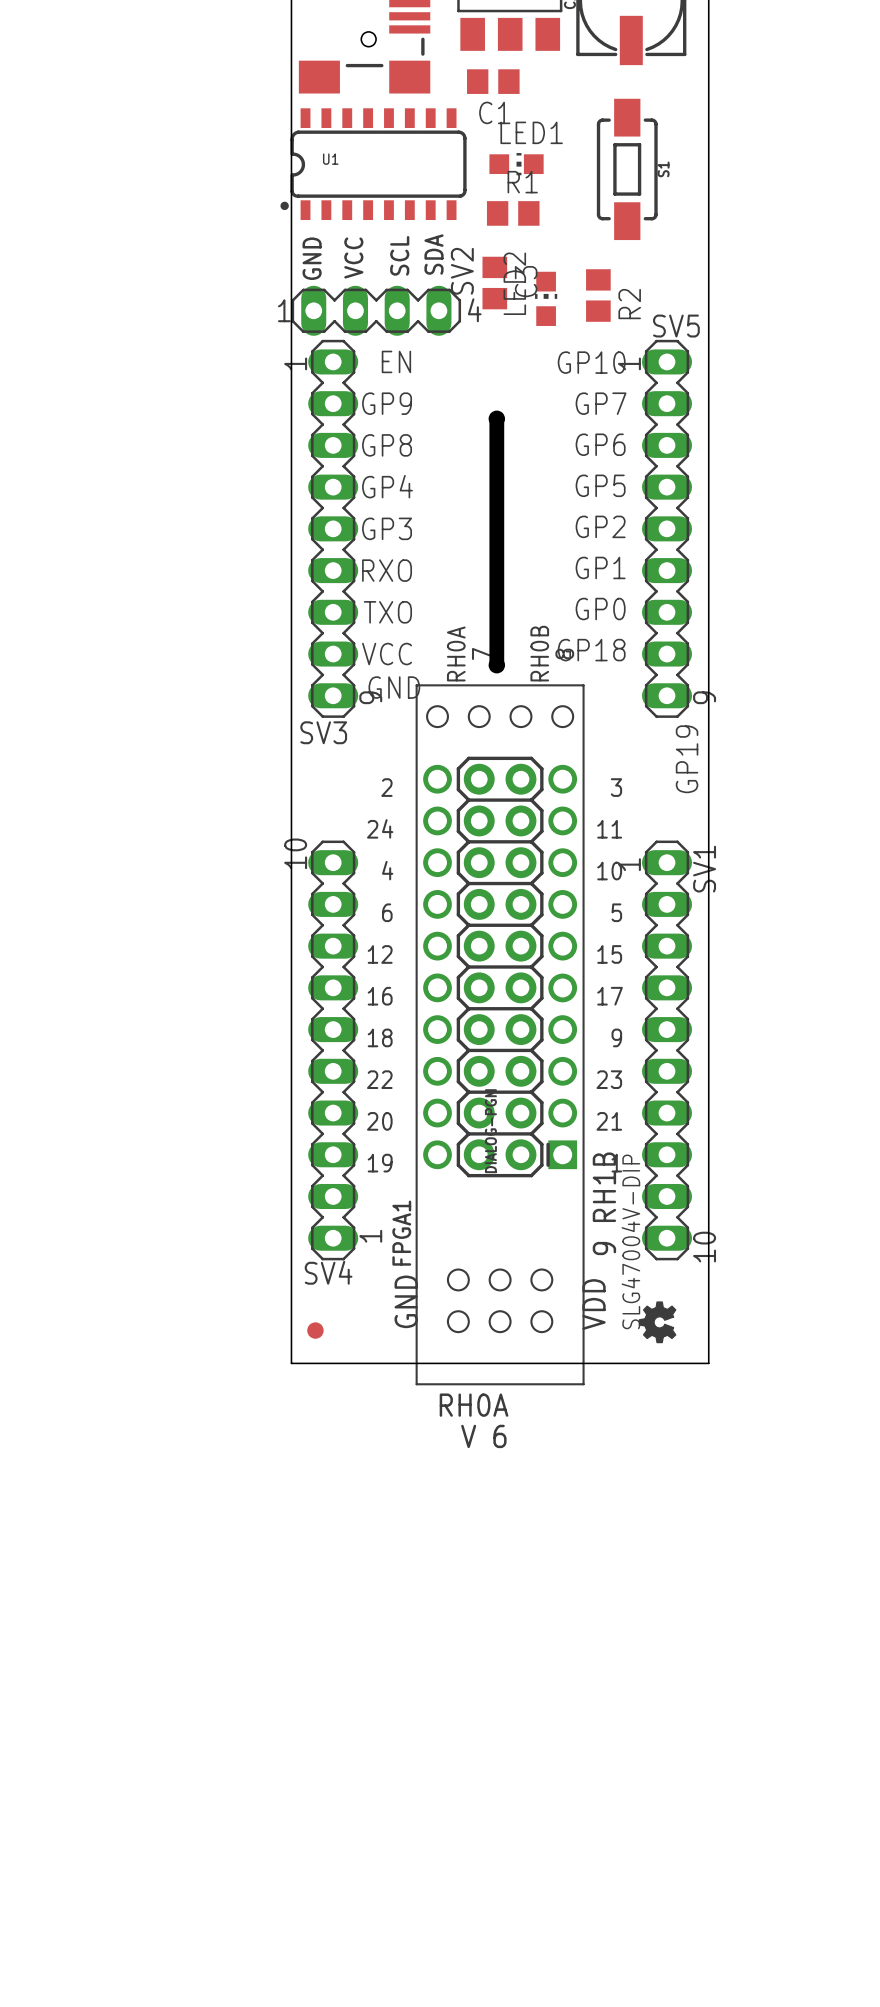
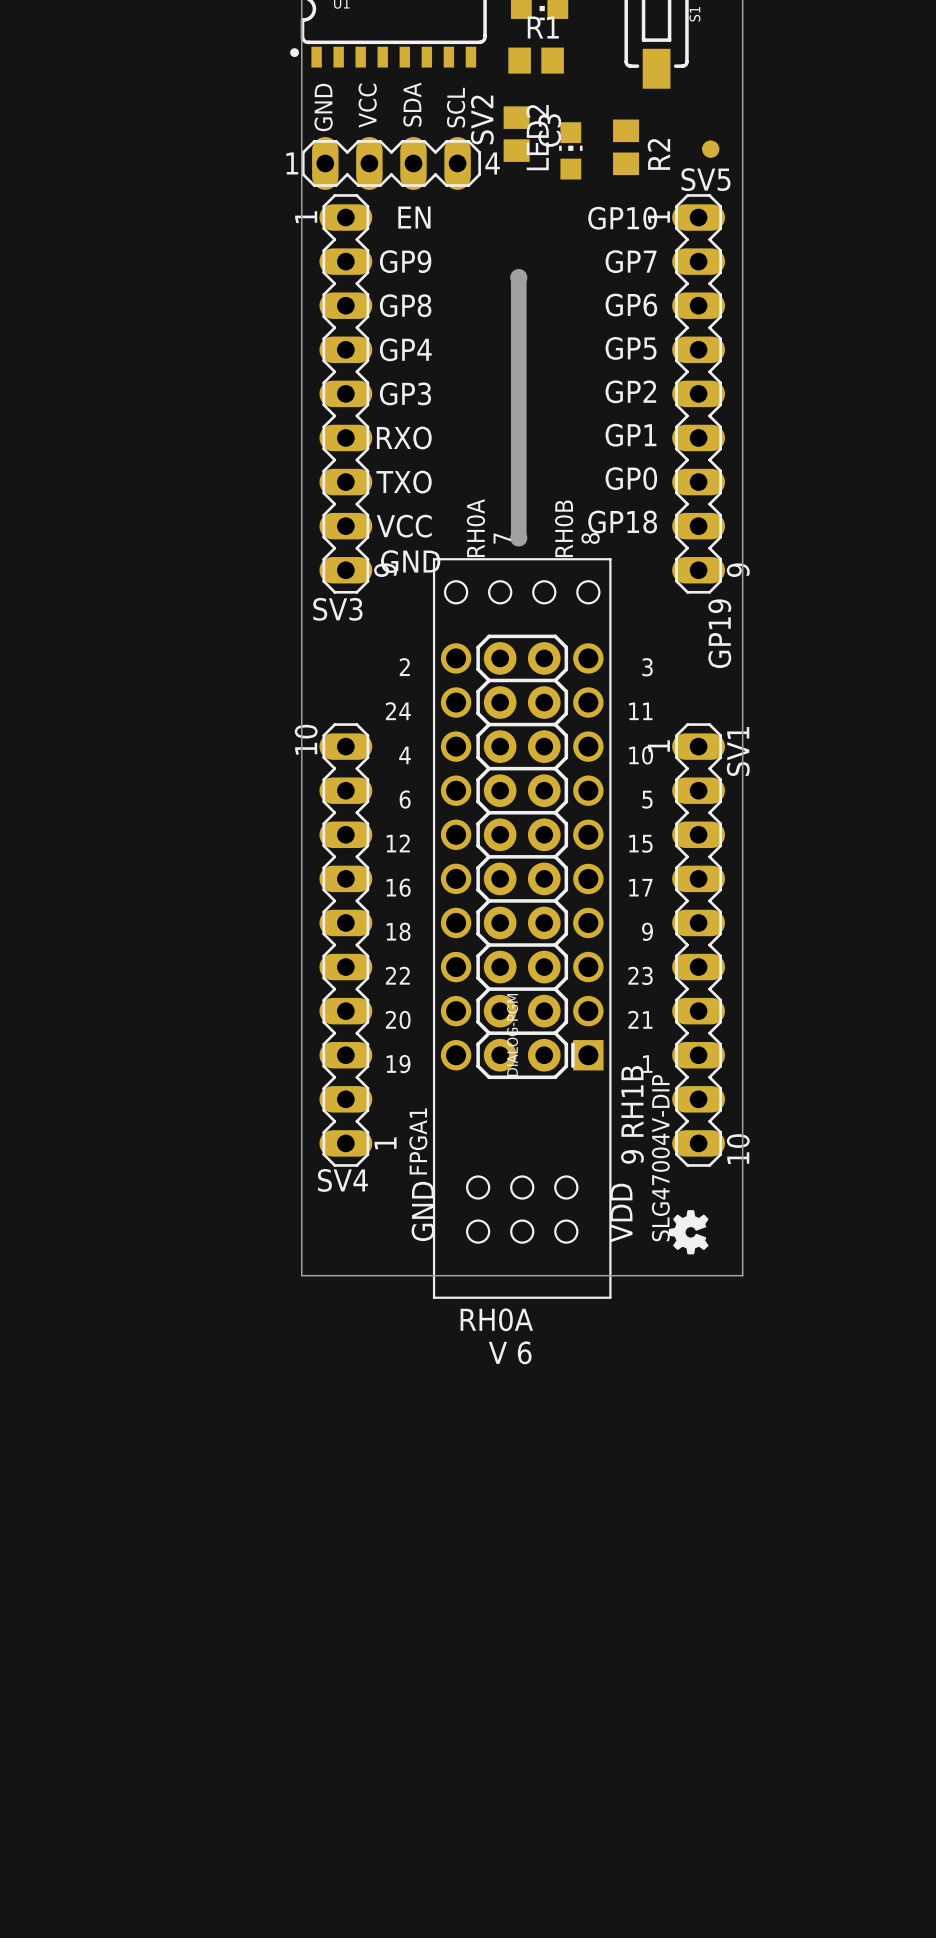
text: SDA (434, 254) -> SCL (456, 107)
text: SCL (399, 255) -> SDA (412, 104)
part: none -> (710, 149)
part: (315, 1330) -> none

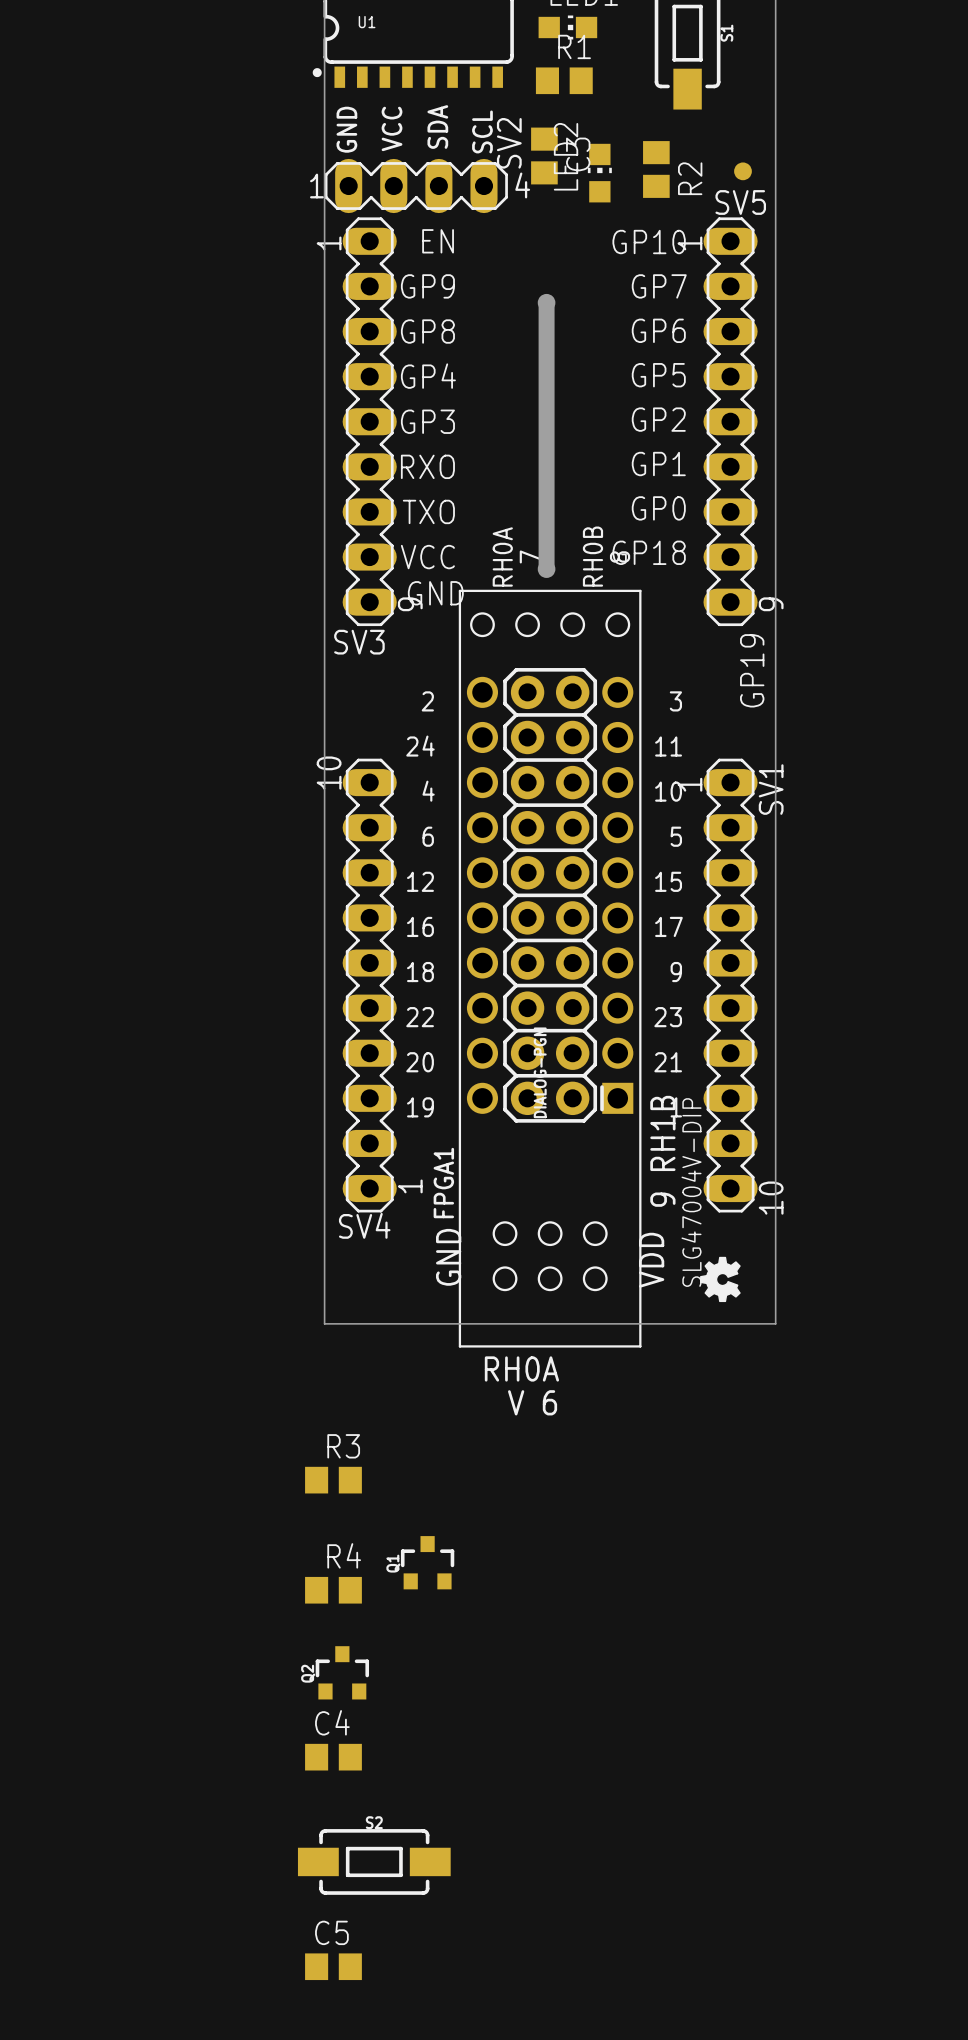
R3: none -> (333, 1480)
Q1: none -> (427, 1562)
R4: none -> (333, 1590)
Q2: none -> (342, 1672)
C4: none -> (333, 1757)
S2: none -> (374, 1861)
C5: none -> (333, 1966)

